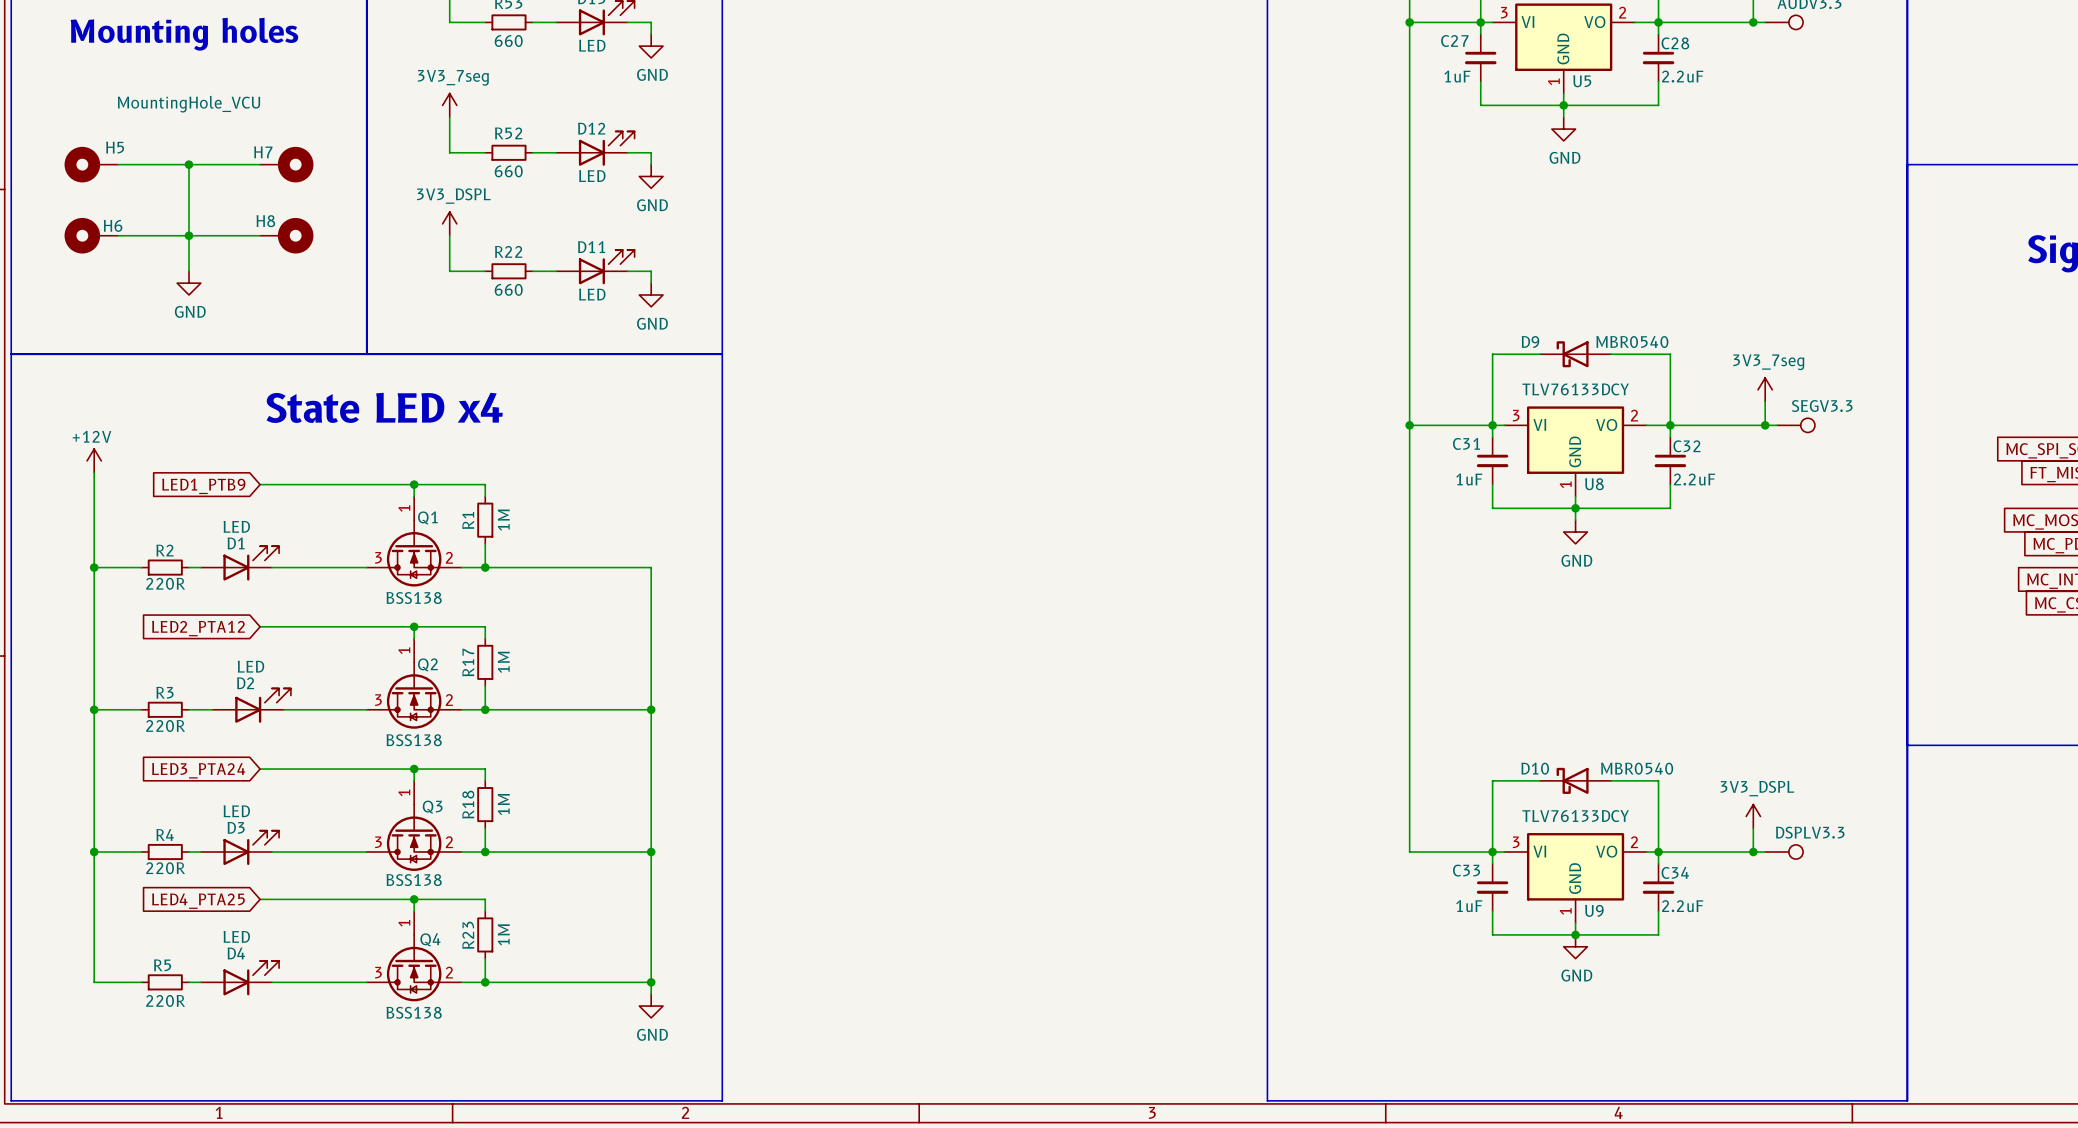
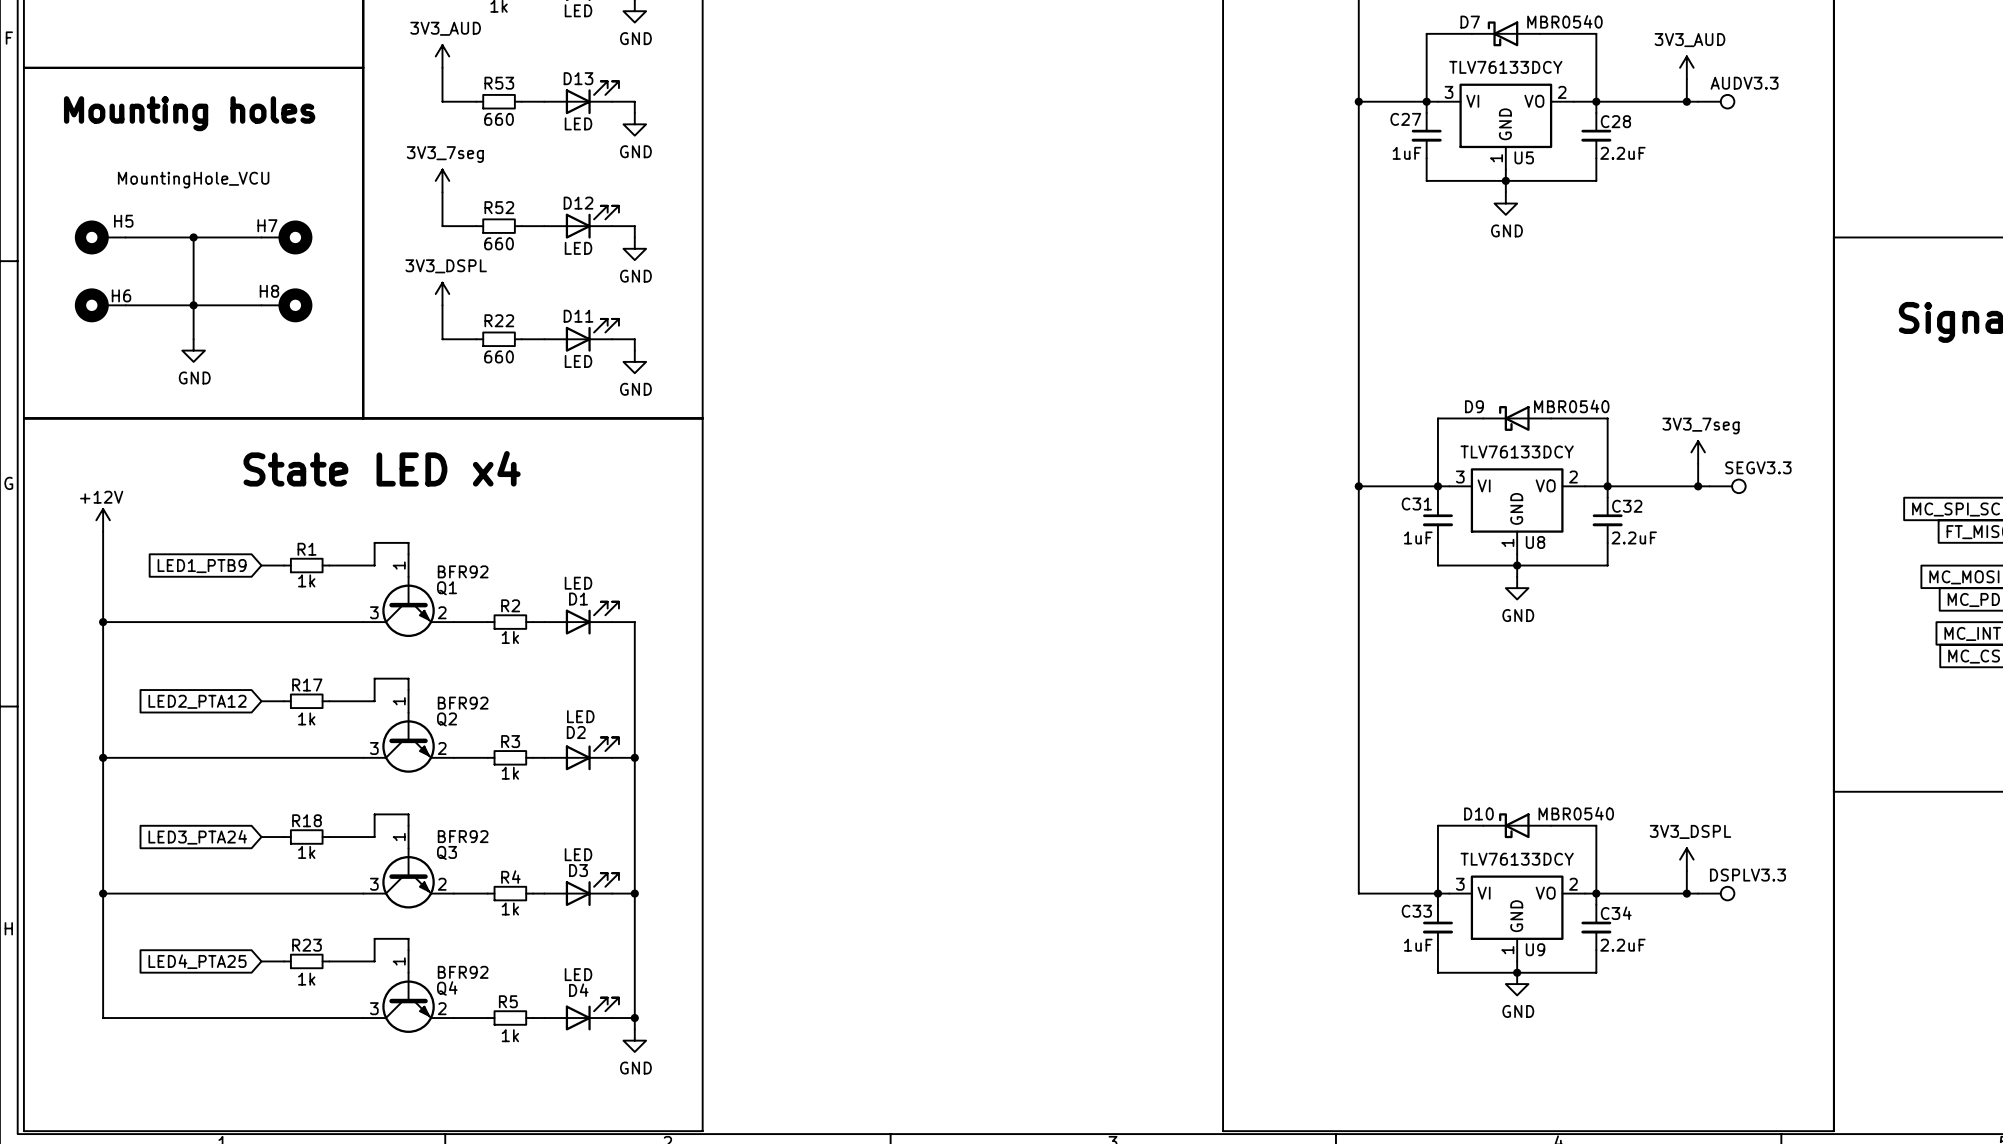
wire: (260, 484) (378, 484) -> (329, 565) (374, 565) (374, 542)
wire: (414, 484) (485, 484) (485, 496) -> none
junction: (414, 484) -> none
global label position: LED1_PTB9 (203, 486) -> LED1_PTB9 (202, 566)
Q1 symbol: [366, 496, 462, 587] -> [363, 554, 454, 638]
wire: none -> (261, 565) (284, 565)
Q1 name position: Q1 (427, 517) -> Q1 (447, 588)
R1 rotation: 0° (485, 520) -> 90° clockwise (306, 565)
R1 position: (485, 520) -> (306, 565)
R1 value: 1M (503, 520) -> 1k (306, 580)
wire: (485, 543) (485, 567) -> none
D1 position: (239, 563) -> (581, 618)
wire: none -> (148, 622) (193, 622)
R2 position: (165, 567) -> (510, 622)
junction: (485, 567) -> none
wire: (497, 567) (544, 567) -> none
R2 value: 220R (165, 583) -> 1k (510, 637)
Q1 value: BSS138 (414, 598) -> BFR92 (463, 571)
wire: (260, 626) (378, 626) -> (329, 701) (374, 701) (374, 678)
wire: (414, 626) (485, 626) (485, 638) -> none
junction: (414, 626) -> none
global label position: LED2_PTA12 (198, 628) -> LED2_PTA12 (197, 701)
Q2 symbol: [366, 638, 462, 729] -> [363, 689, 454, 773]
wire: none -> (261, 701) (284, 701)
R17 rotation: 0° (485, 662) -> 90° clockwise (306, 701)
R17 position: (485, 662) -> (306, 701)
R17 value: 1M (503, 662) -> 1k (306, 718)
Q2 name position: Q2 (427, 664) -> Q2 (447, 719)
wire: (485, 686) (485, 709) -> none
D2 position: (251, 705) -> (581, 753)
wire: none -> (148, 757) (193, 757)
R3 position: (165, 709) -> (510, 757)
junction: (485, 709) -> none
wire: (497, 709) (544, 709) -> none
R3 value: 220R (165, 726) -> 1k (510, 773)
Q2 value: BSS138 (414, 740) -> BFR92 (463, 703)
wire: (260, 769) (378, 769) -> (329, 837) (374, 837) (374, 814)
wire: (414, 769) (485, 769) (485, 780) -> none
junction: (414, 769) -> none
global label position: LED3_PTA24 (198, 770) -> LED3_PTA24 (197, 837)
Q3 symbol: [366, 780, 462, 871] -> [363, 825, 454, 909]
wire: none -> (261, 837) (284, 837)
R18 rotation: 0° (485, 804) -> 90° clockwise (306, 837)
R18 position: (485, 804) -> (306, 837)
R18 value: 1M (503, 804) -> 1k (306, 852)
Q3 name position: Q3 (432, 807) -> Q3 (447, 852)
wire: (485, 828) (485, 851) -> none
D3 position: (239, 847) -> (581, 889)
wire: none -> (148, 893) (193, 893)
R4 position: (165, 851) -> (510, 893)
junction: (485, 851) -> none
wire: (497, 851) (544, 851) -> none
R4 value: 220R (165, 868) -> 1k (510, 908)
Q3 value: BSS138 (414, 880) -> BFR92 (463, 836)
wire: (260, 899) (378, 899) -> (329, 961) (374, 961) (374, 938)
wire: (414, 899) (485, 899) (485, 911) -> none
junction: (414, 899) -> none
global label position: LED4_PTA25 (198, 901) -> LED4_PTA25 (197, 961)
Q4 symbol: [366, 911, 462, 1002] -> [363, 950, 454, 1033]
wire: none -> (261, 961) (284, 961)
R23 rotation: 0° (485, 934) -> 90° clockwise (306, 961)
R23 position: (485, 934) -> (306, 961)
R23 value: 1M (503, 934) -> 1k (306, 979)
Q4 name position: Q4 (430, 939) -> Q4 (447, 988)
wire: (485, 958) (485, 982) -> none
D4 position: (239, 978) -> (581, 1014)
wire: none -> (148, 1018) (193, 1018)
R5 position: (165, 982) -> (510, 1018)
junction: (485, 982) -> none
wire: (497, 982) (544, 982) -> none
R5 value: 220R (165, 1000) -> 1k (510, 1035)
Q4 value: BSS138 (414, 1012) -> BFR92 (463, 972)

